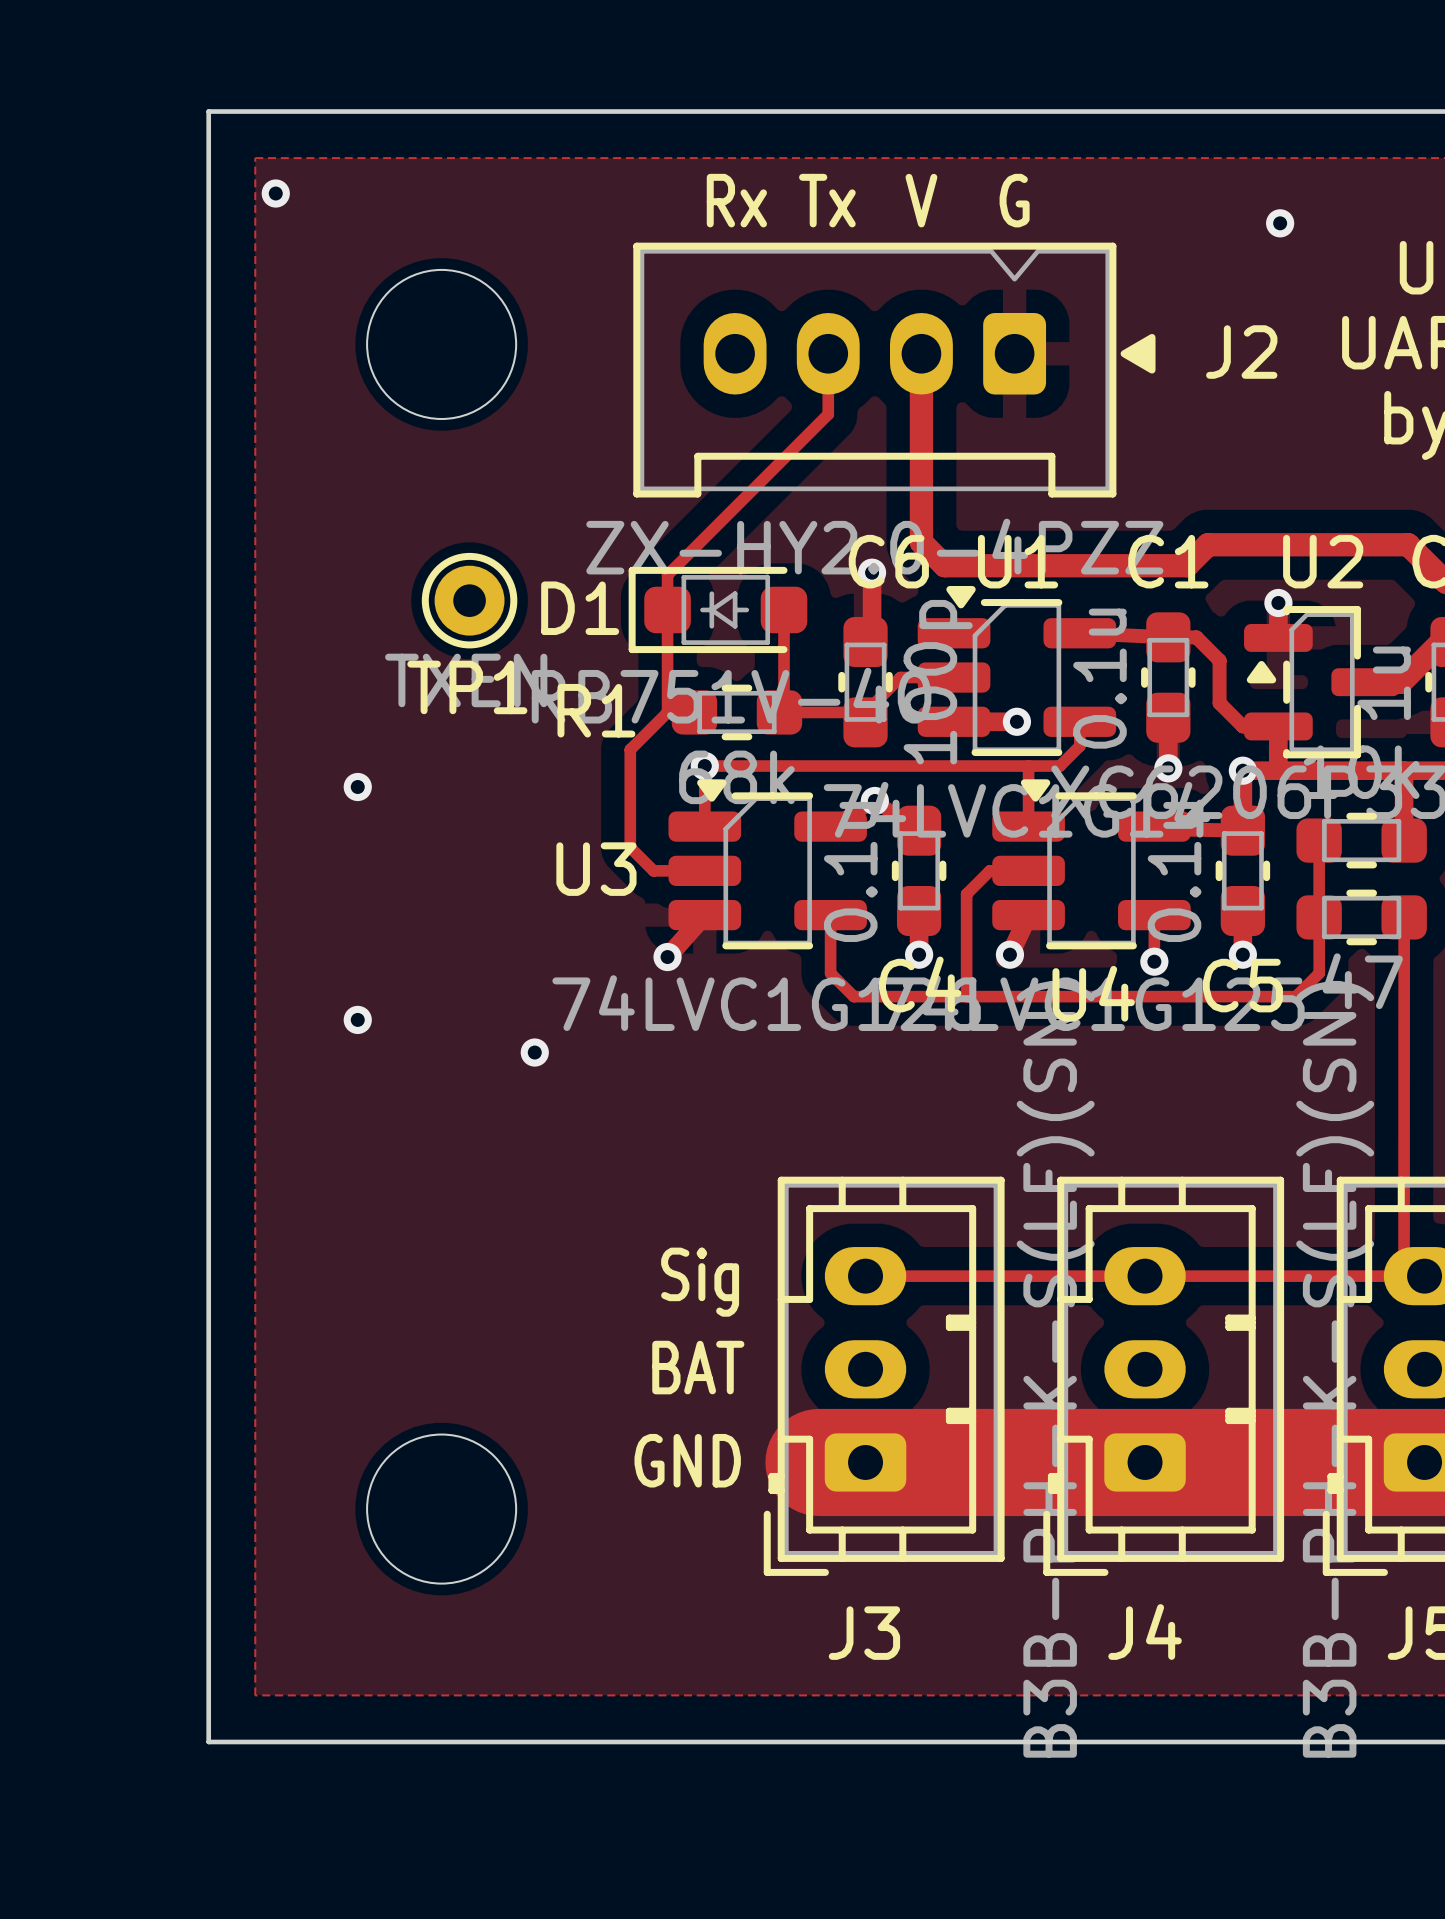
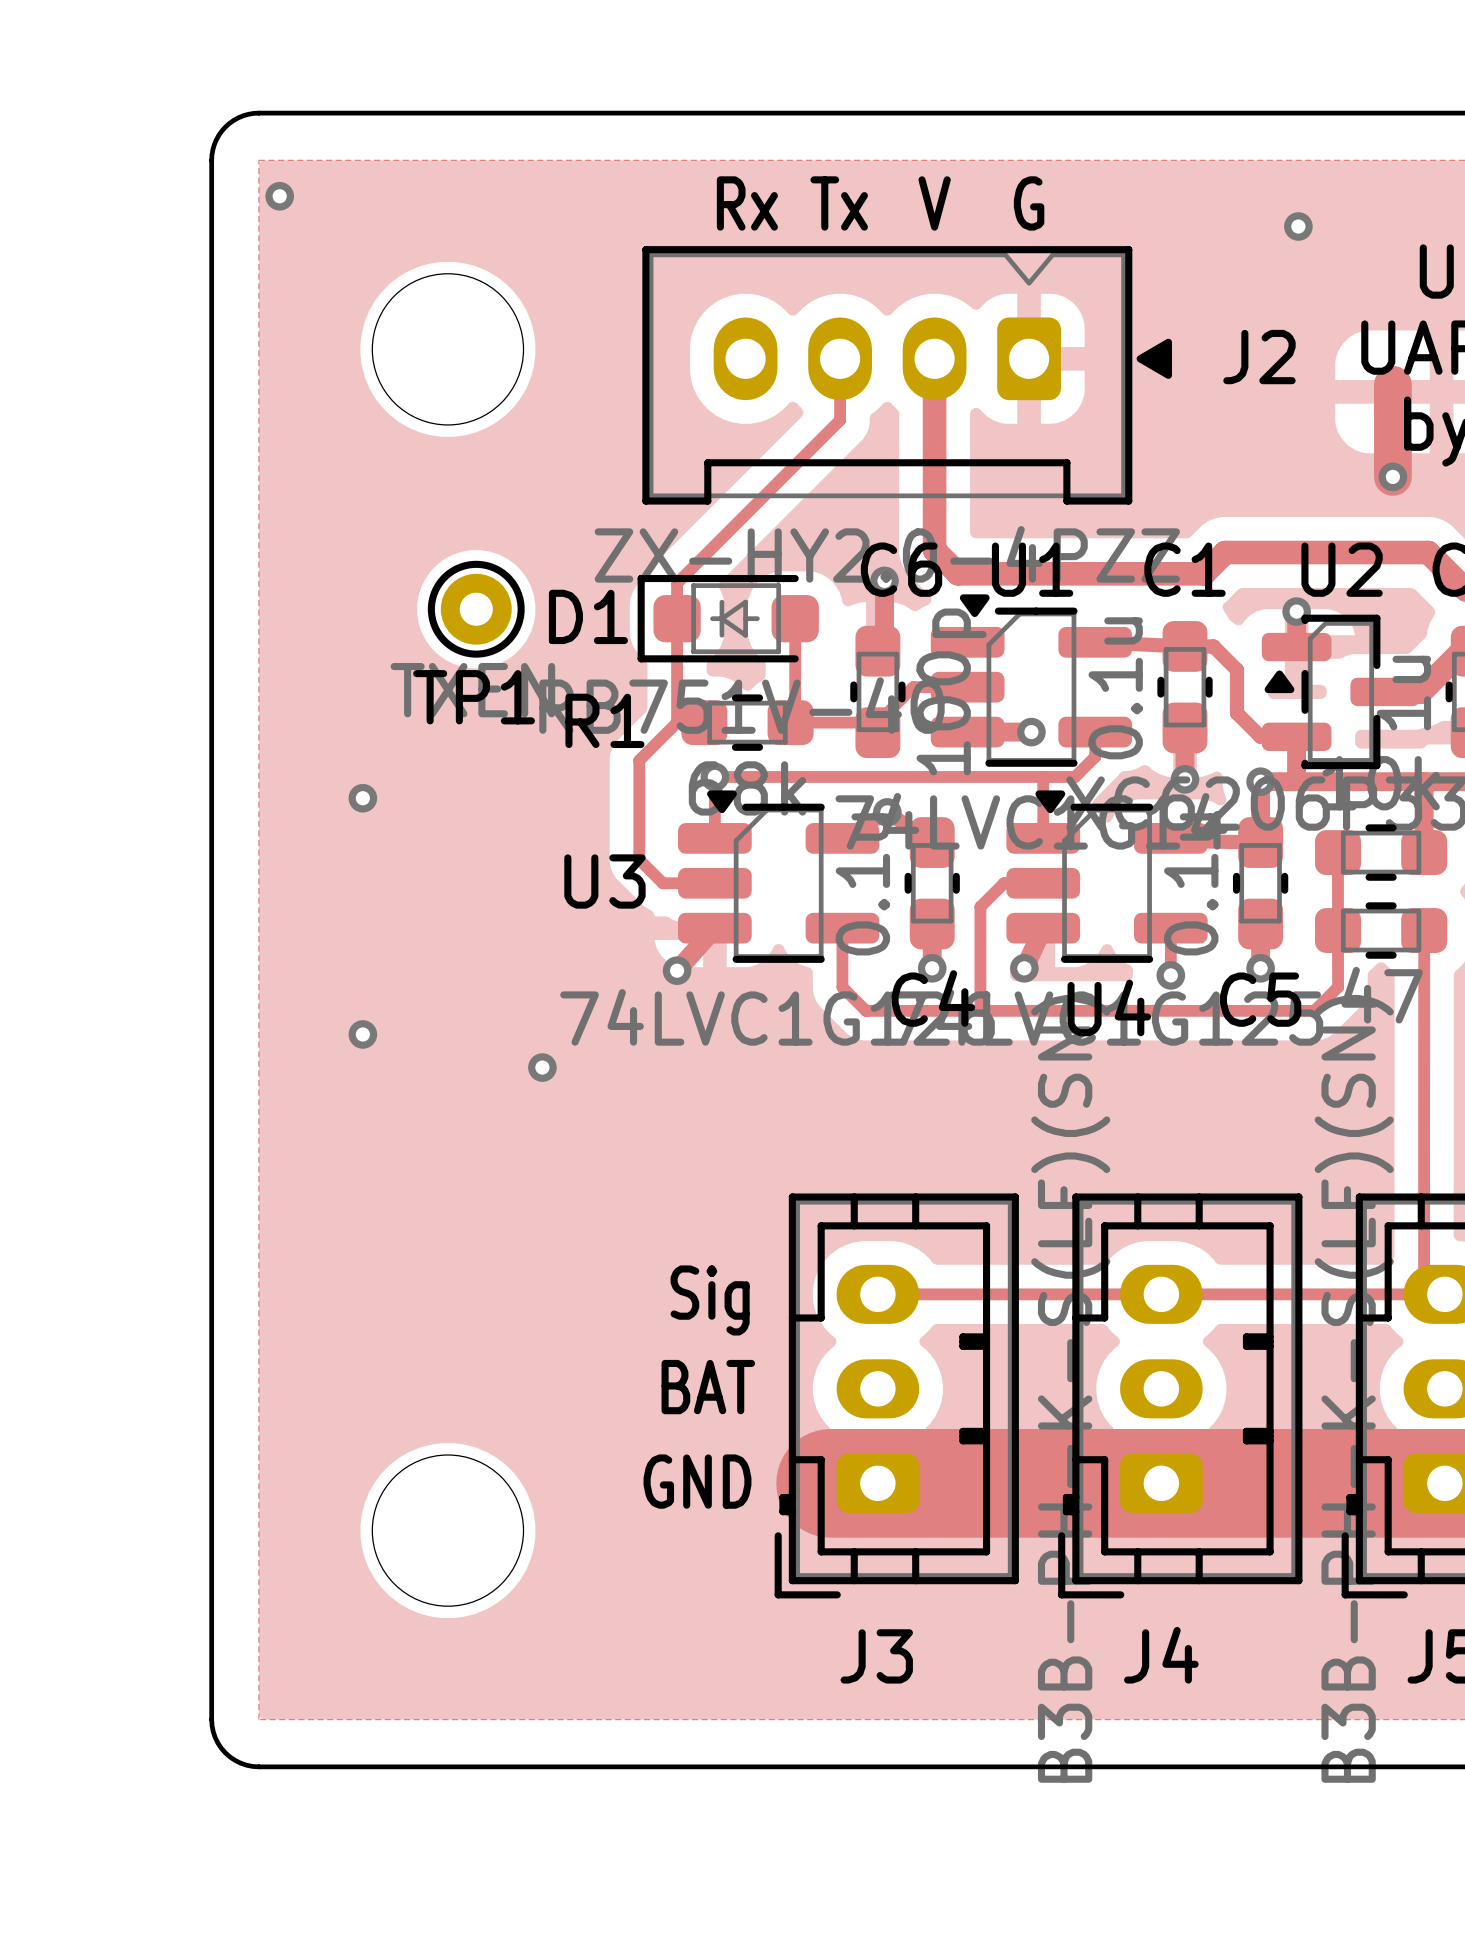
board edge: (255, 111) (208, 111) (208, 158) -> (258, 113) (243, 115) (225, 126) (216, 139) (211, 160)
track: none -> (1392, 384) (1392, 476)
via: none -> (1392, 476)
board edge: (208, 1695) (208, 1741) (255, 1741) -> (211, 1719) (215, 1737) (225, 1753) (240, 1763) (258, 1766)

